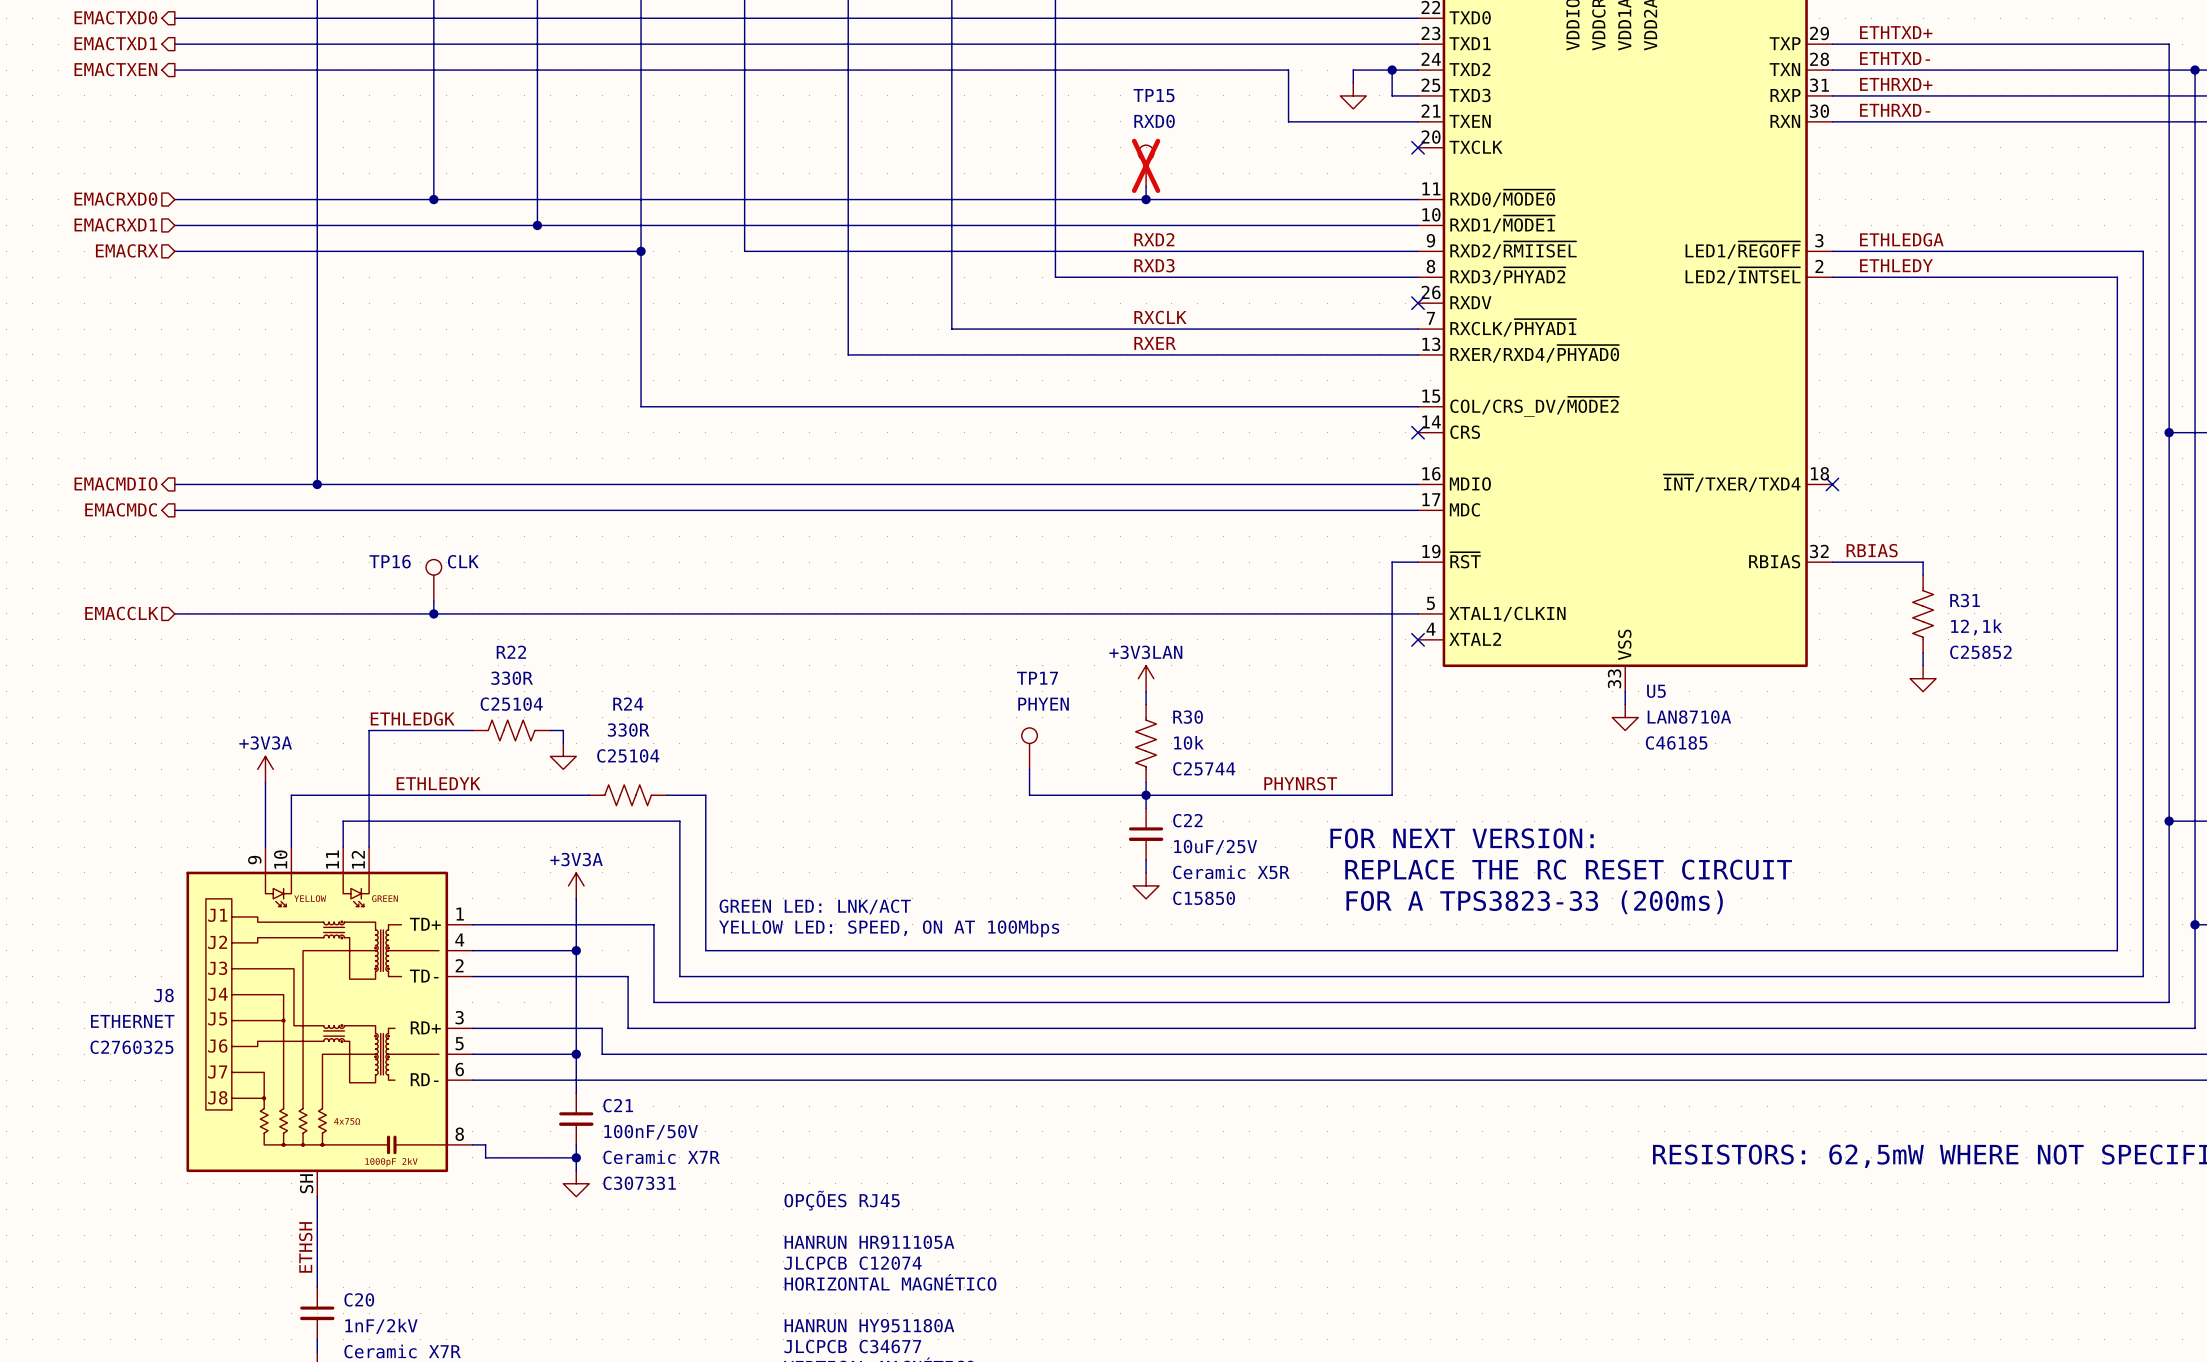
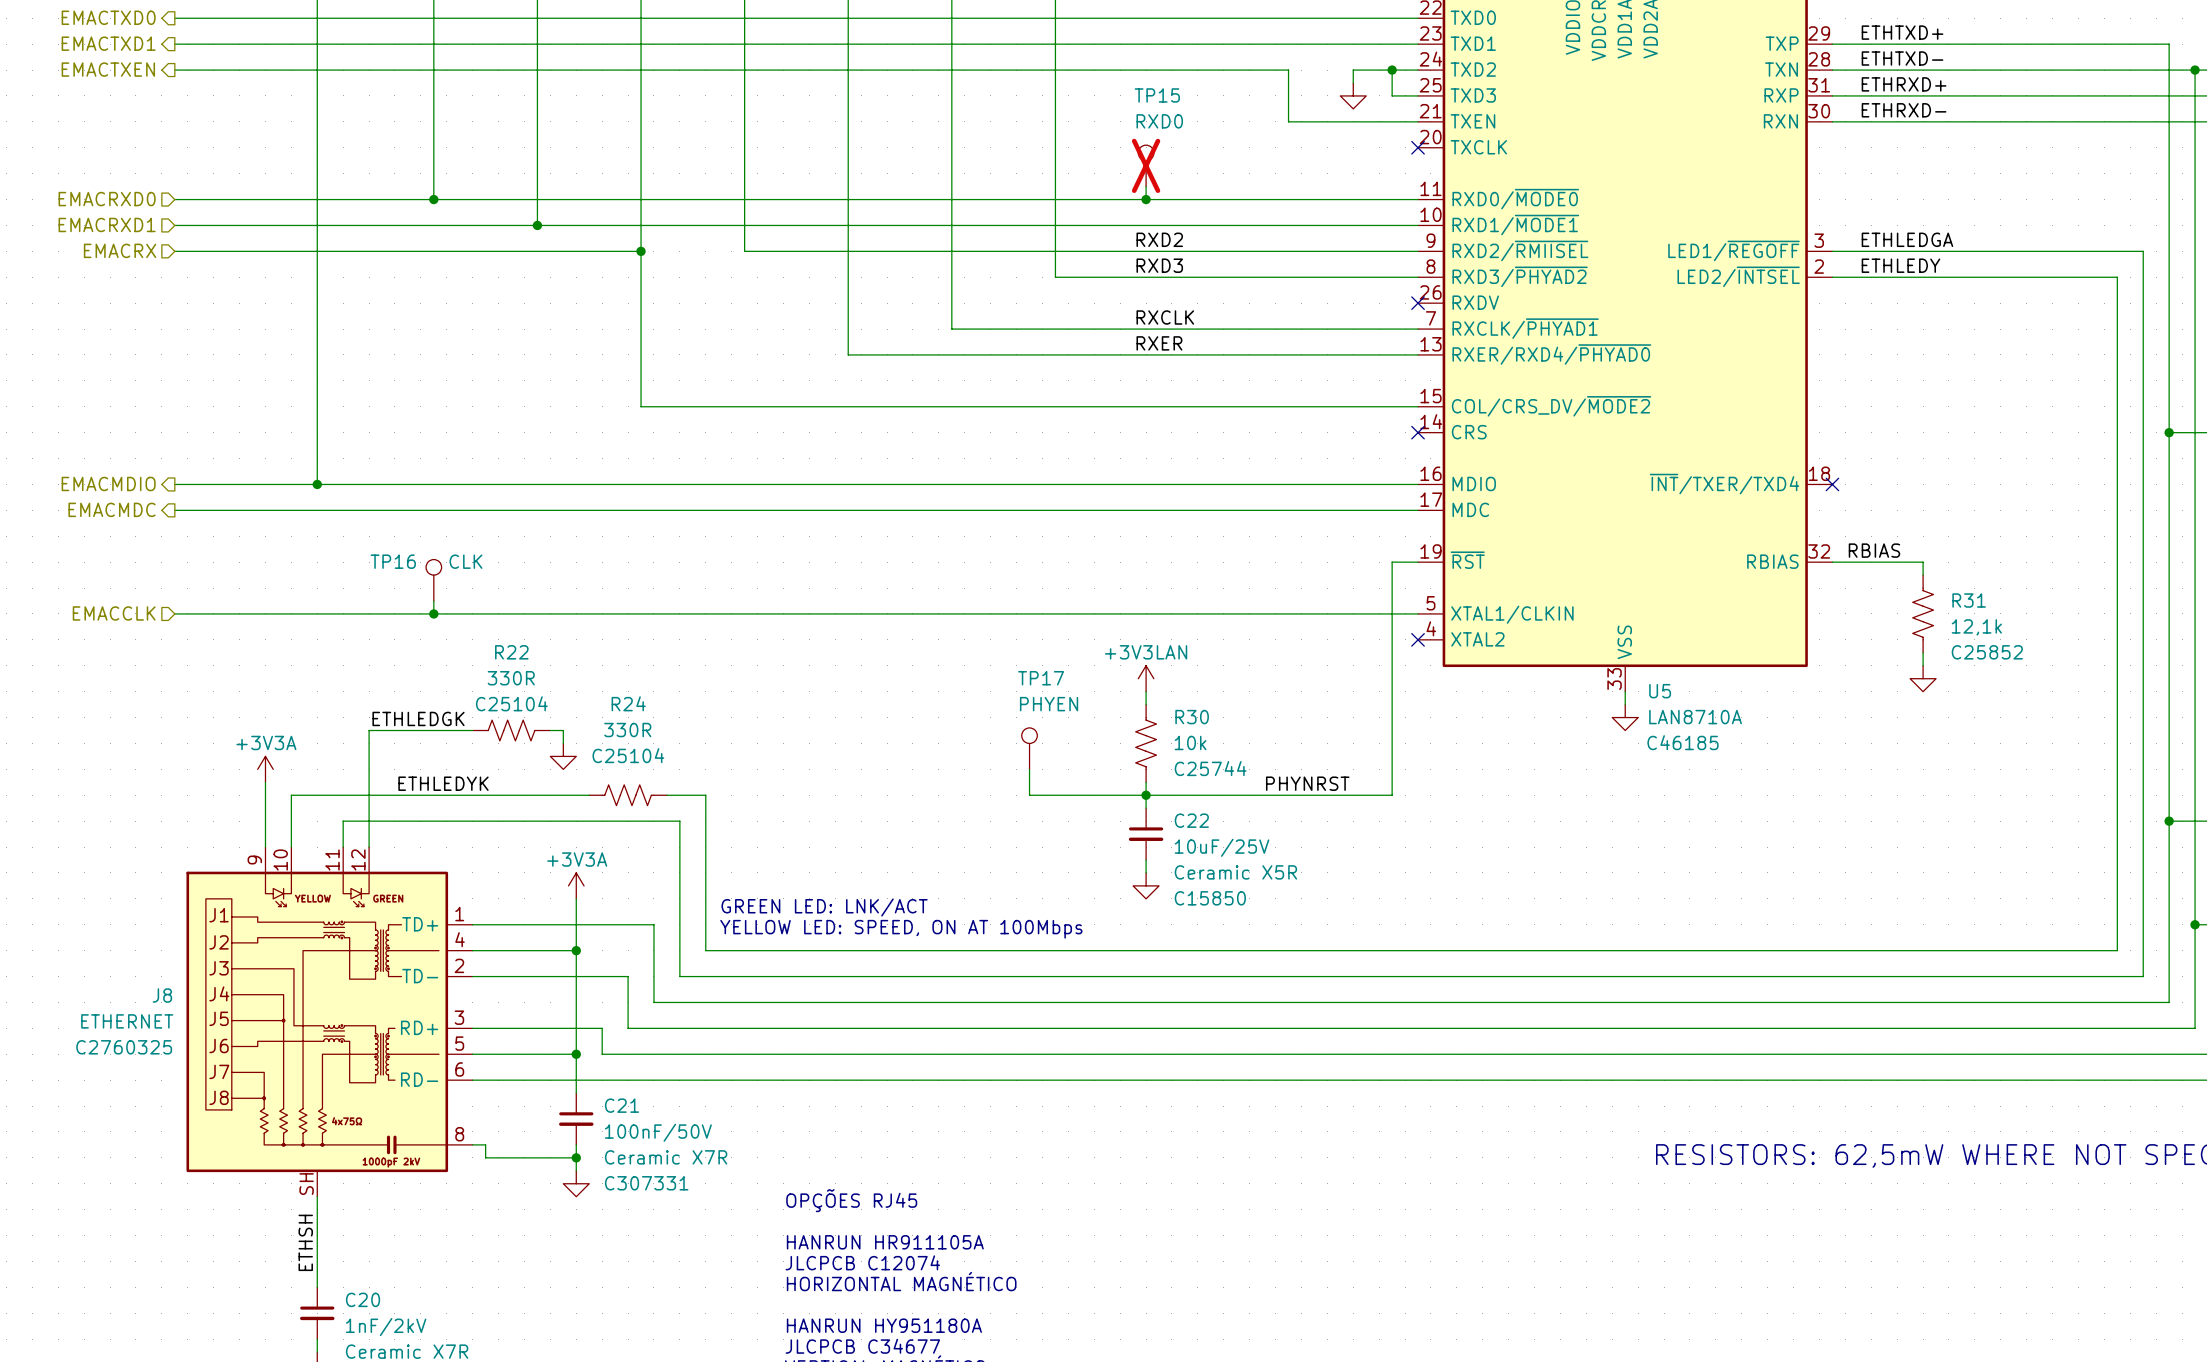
text: FOR NEXT VERSION: (1462, 838) -> none
text: REPLACE THE RC RESET CIRCUIT (1568, 869) -> none
text: FOR A TPS3823-33 (200ms) (1534, 902) -> none

